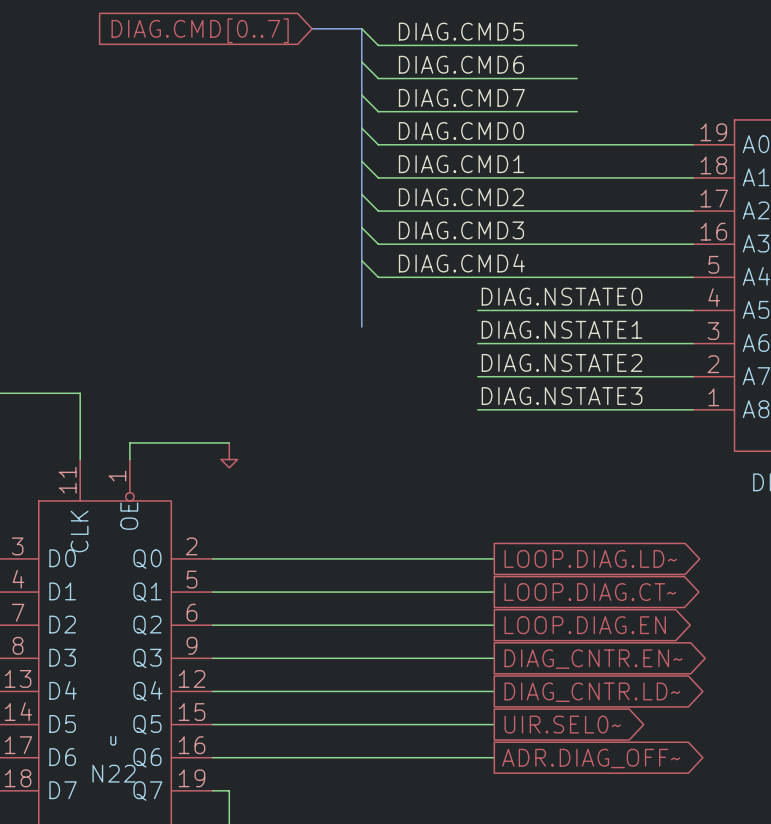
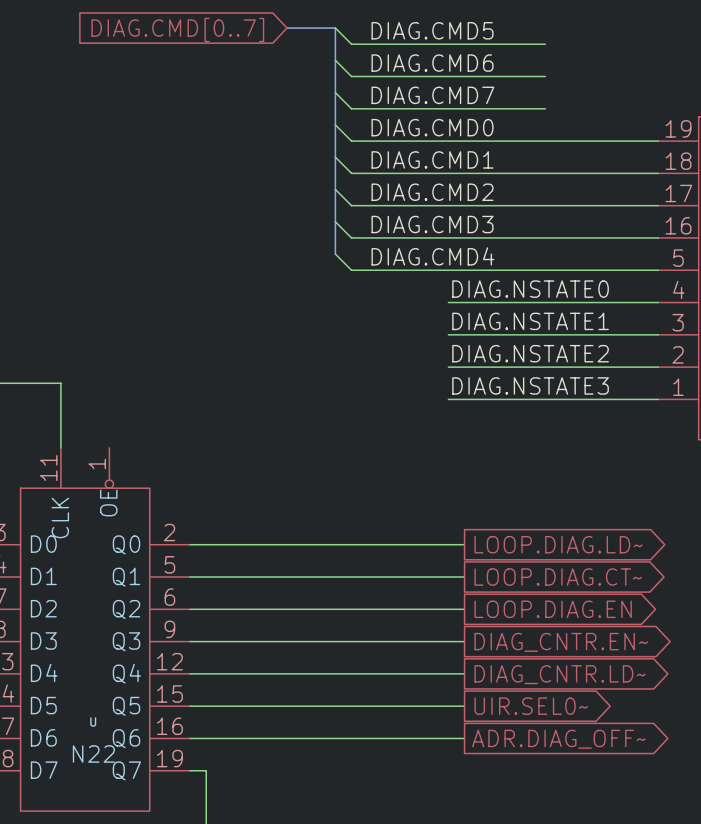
bus: (361, 260) (361, 327) -> none
wire: (229, 442) (129, 442) (129, 459) -> none
power symbol: (229, 455) -> none

